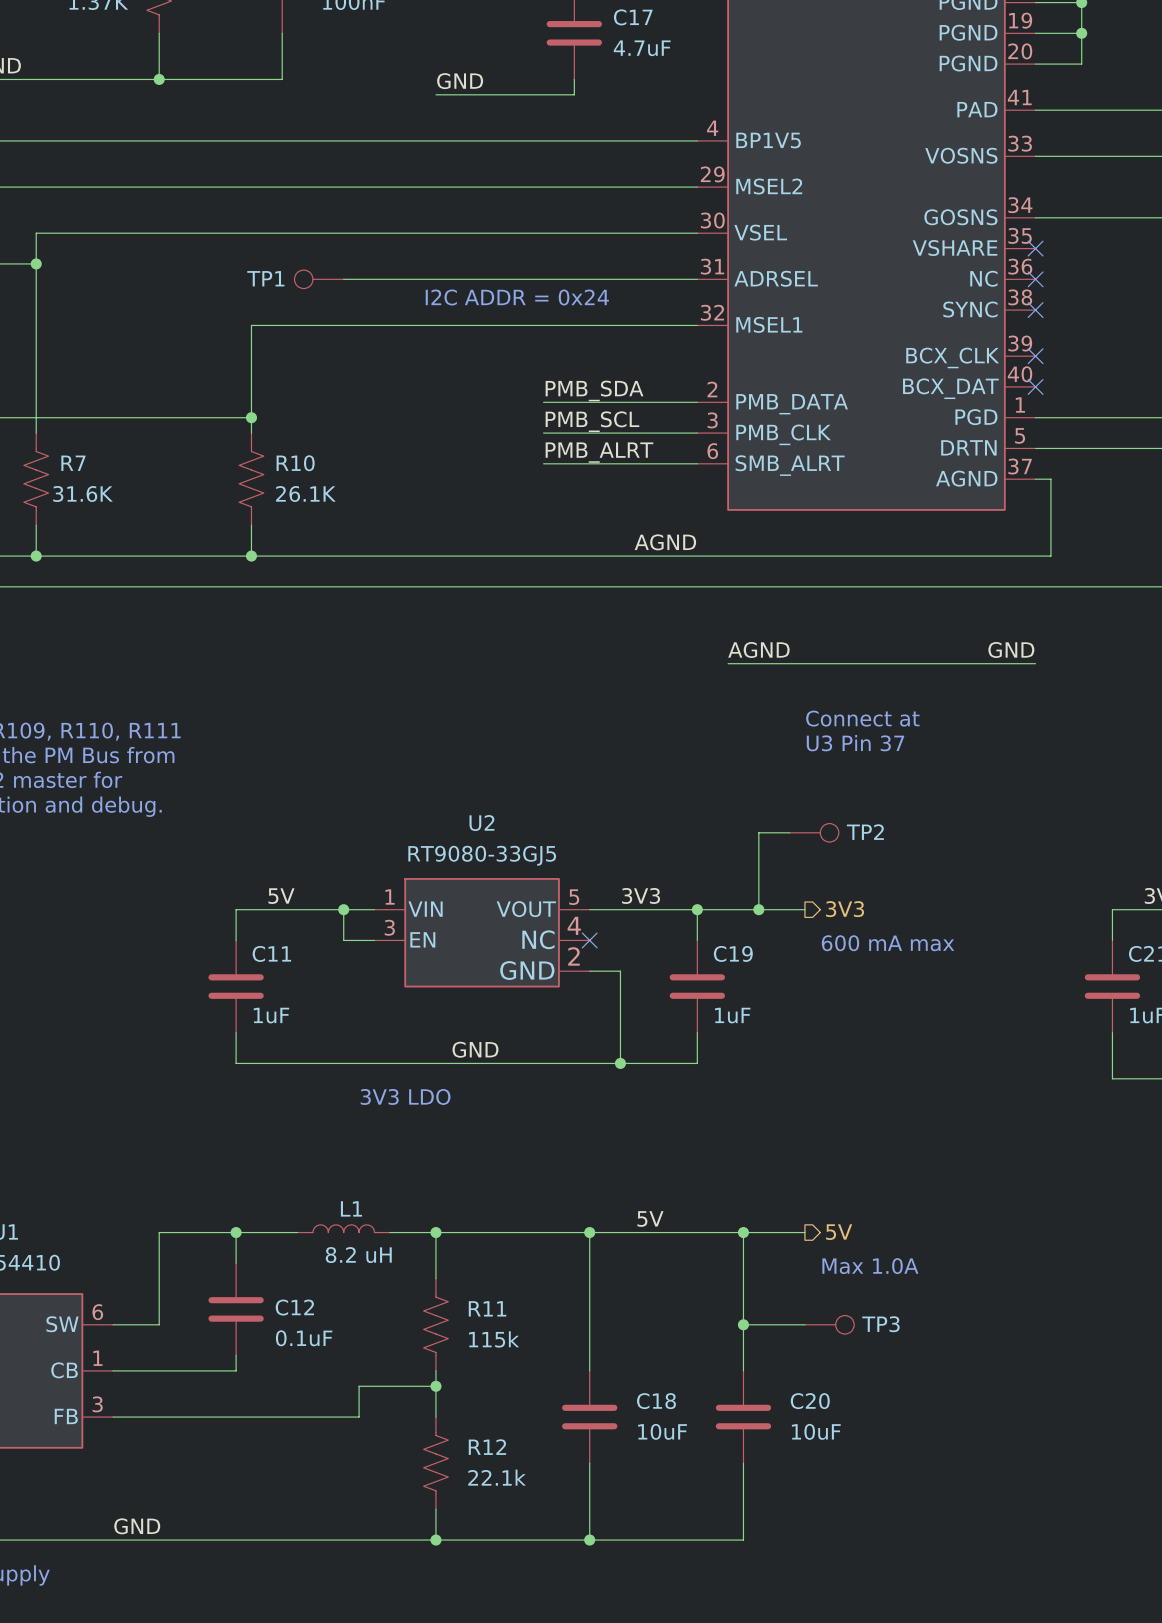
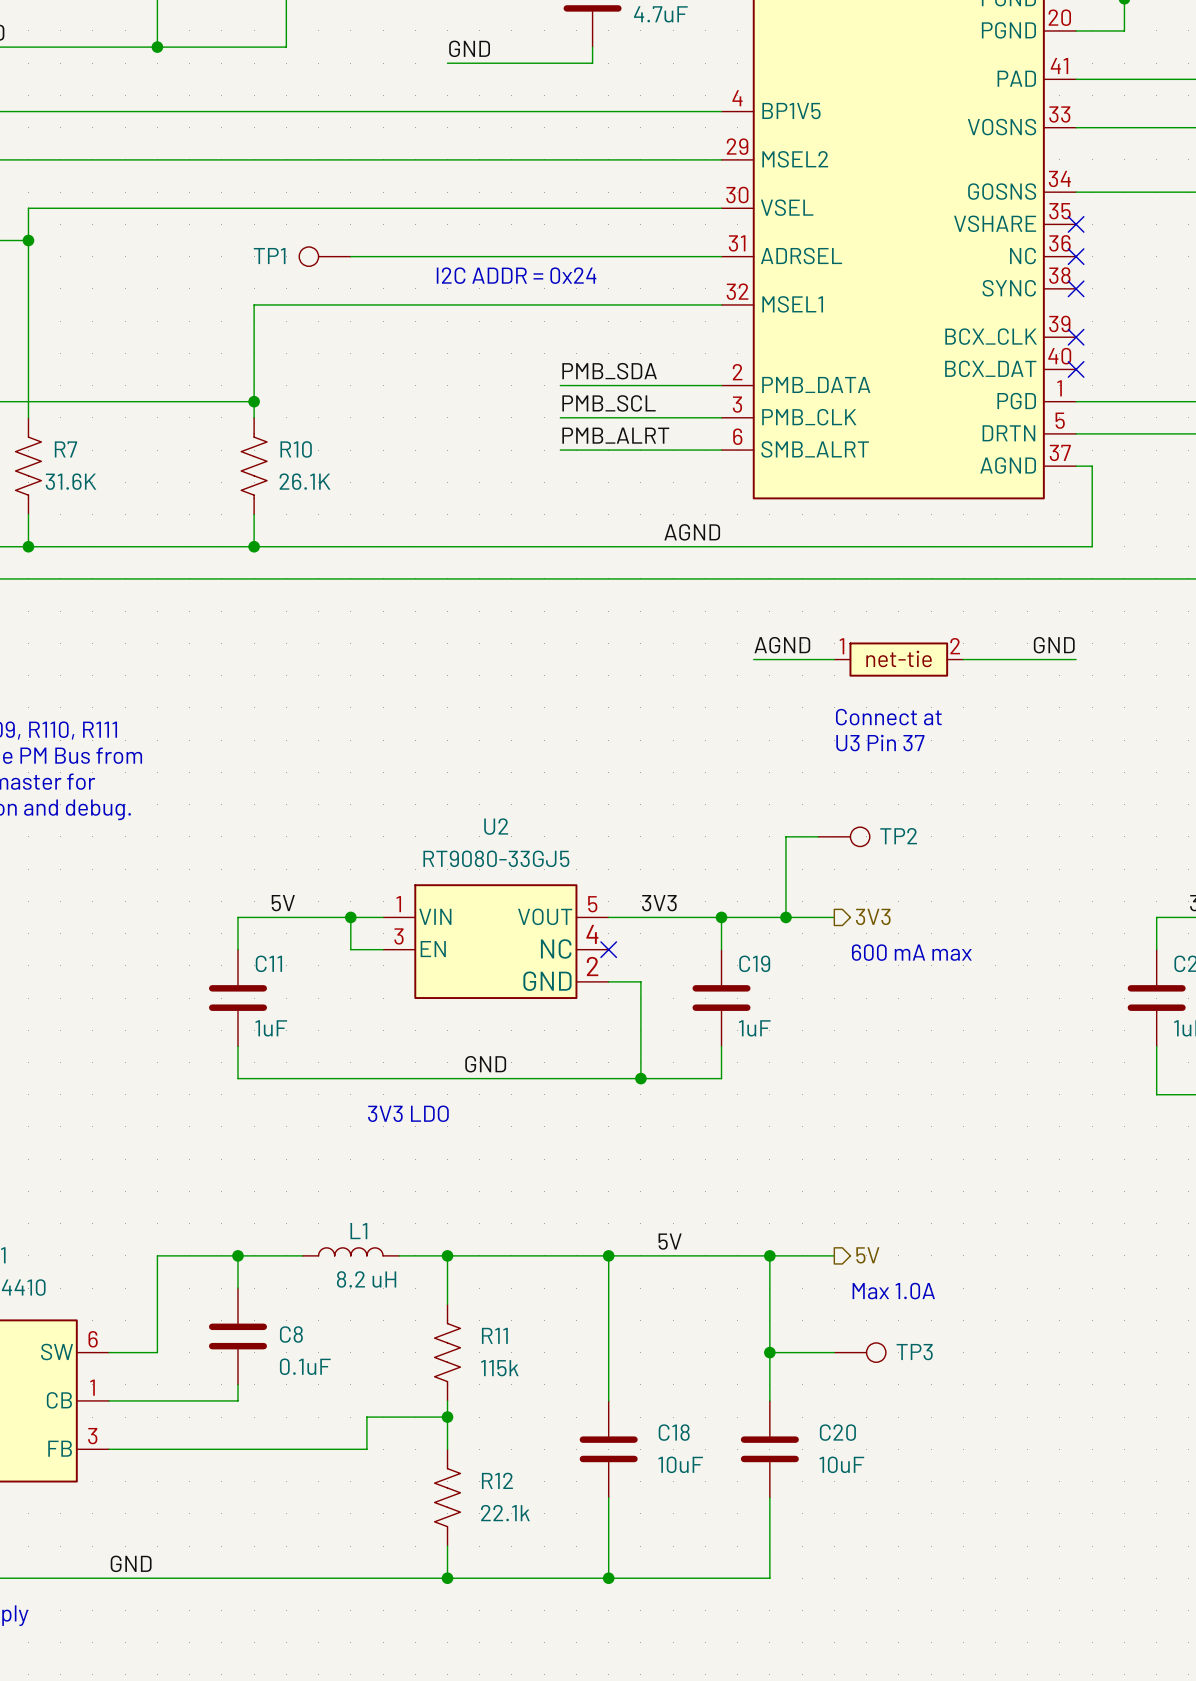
part: none -> (898, 659)
C12 name: C12 (294, 1307) -> C8 (291, 1334)

